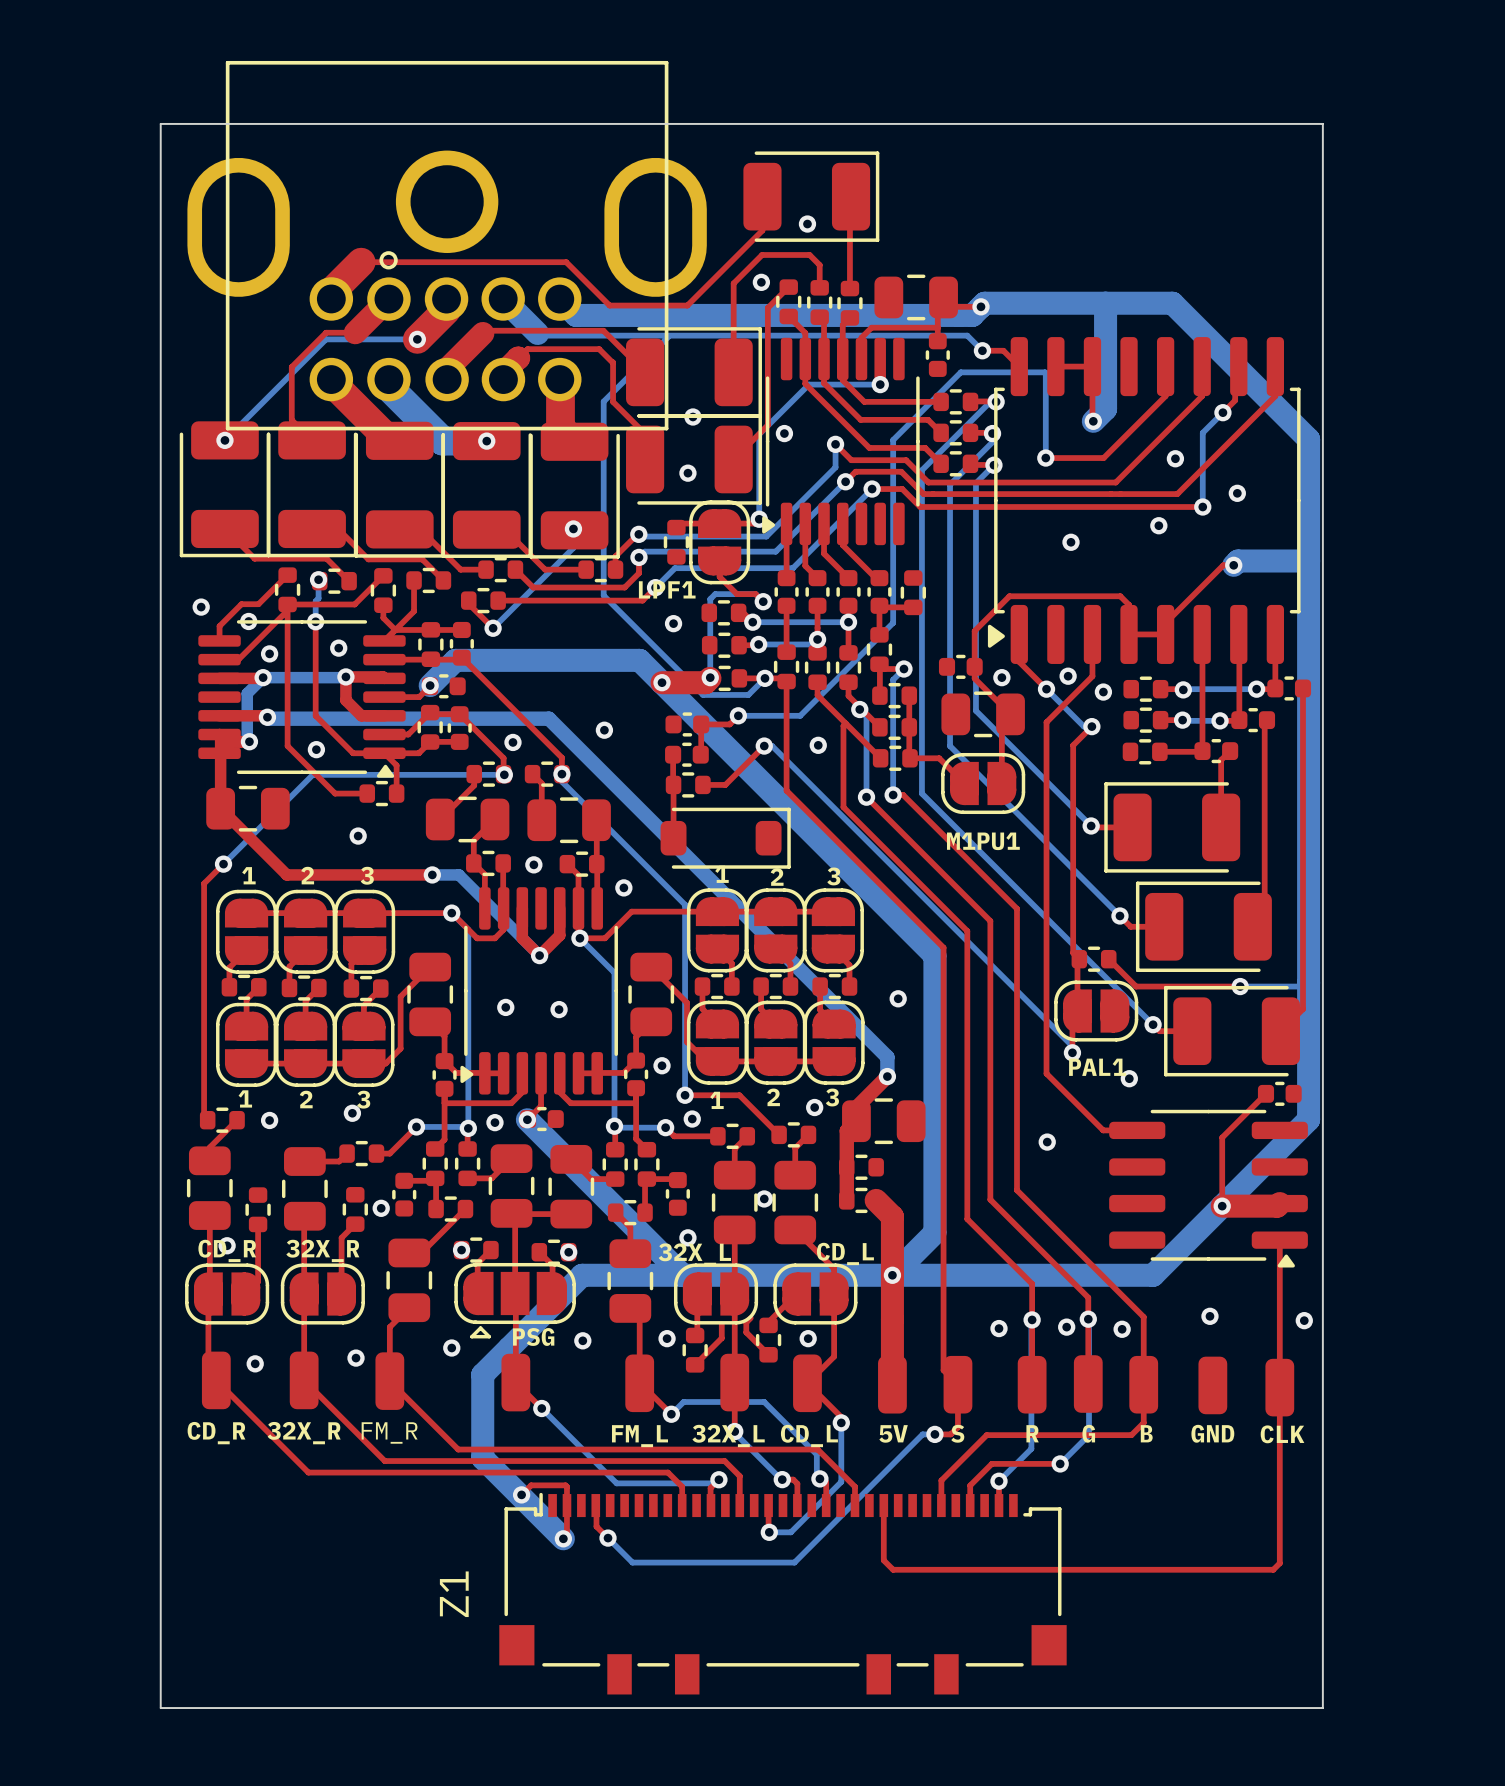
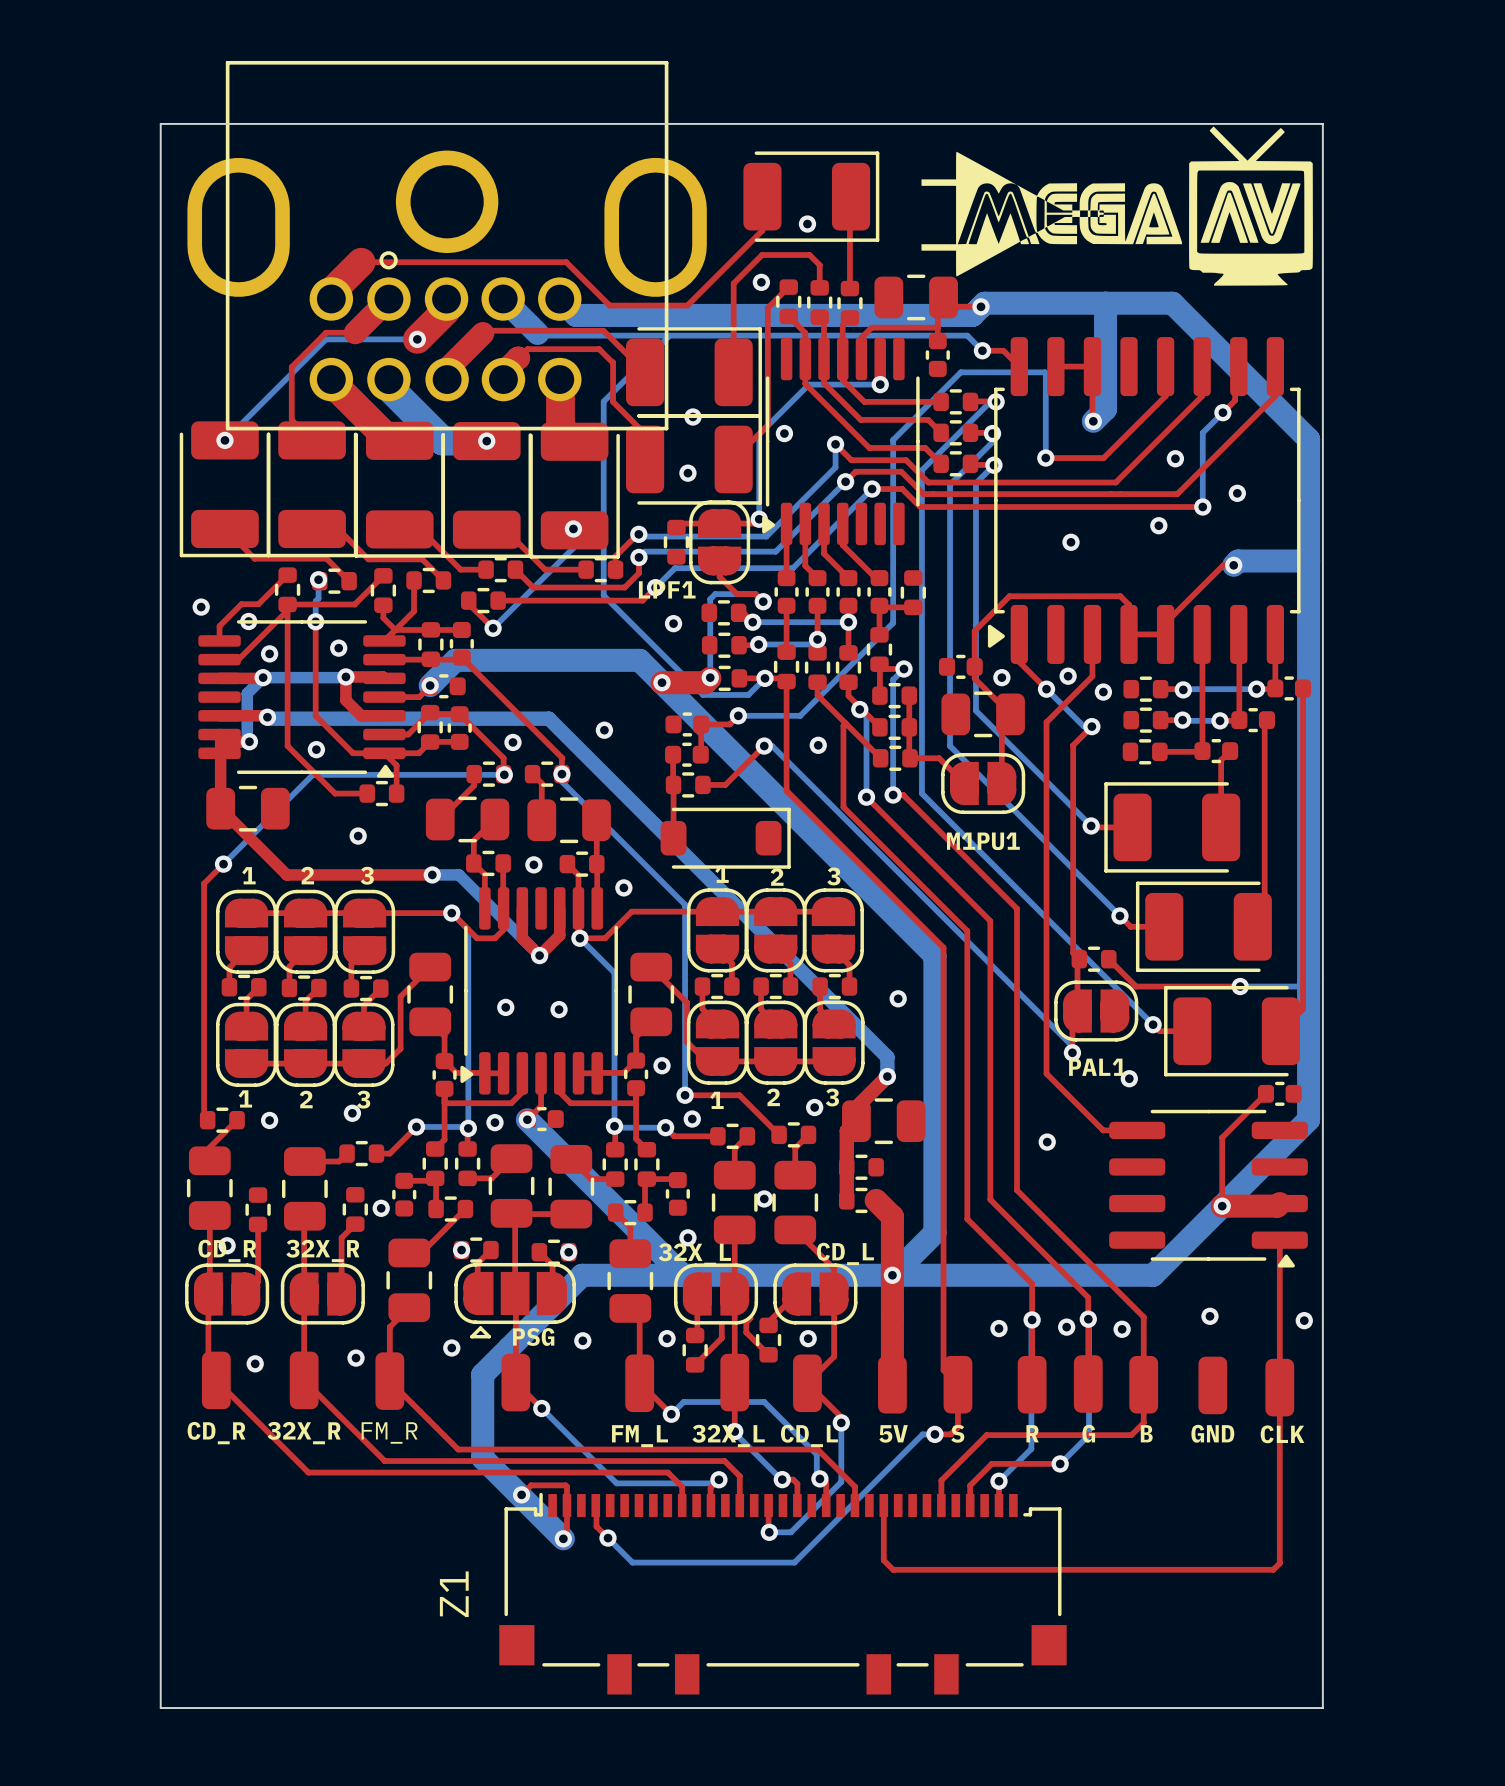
drawing: none -> [921, 126, 1313, 286]

